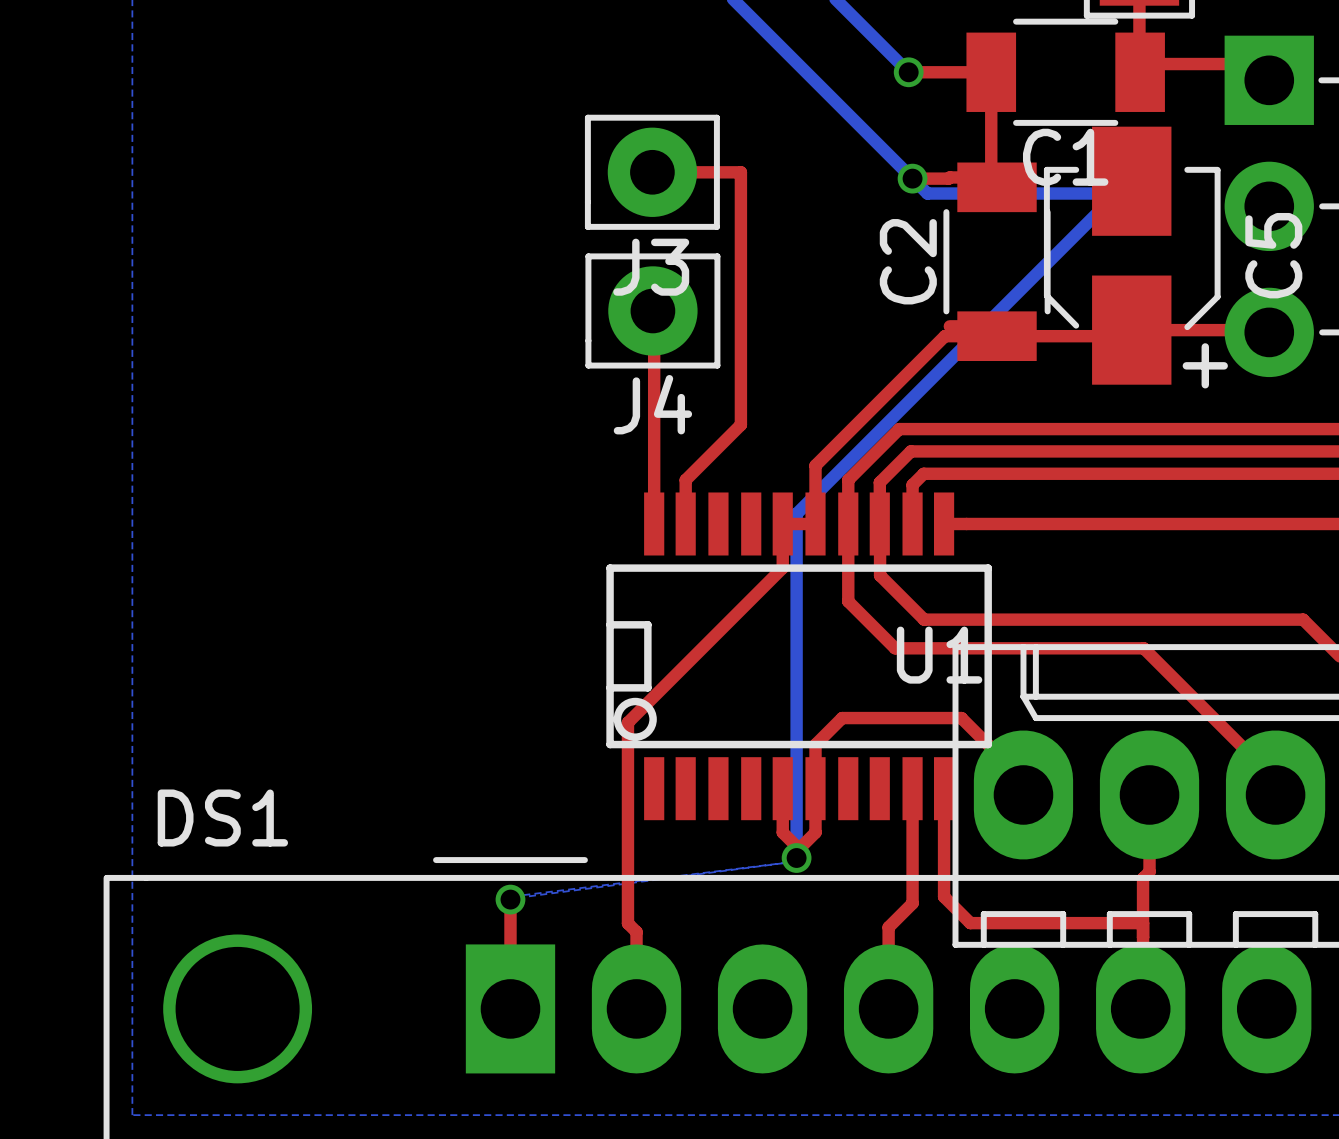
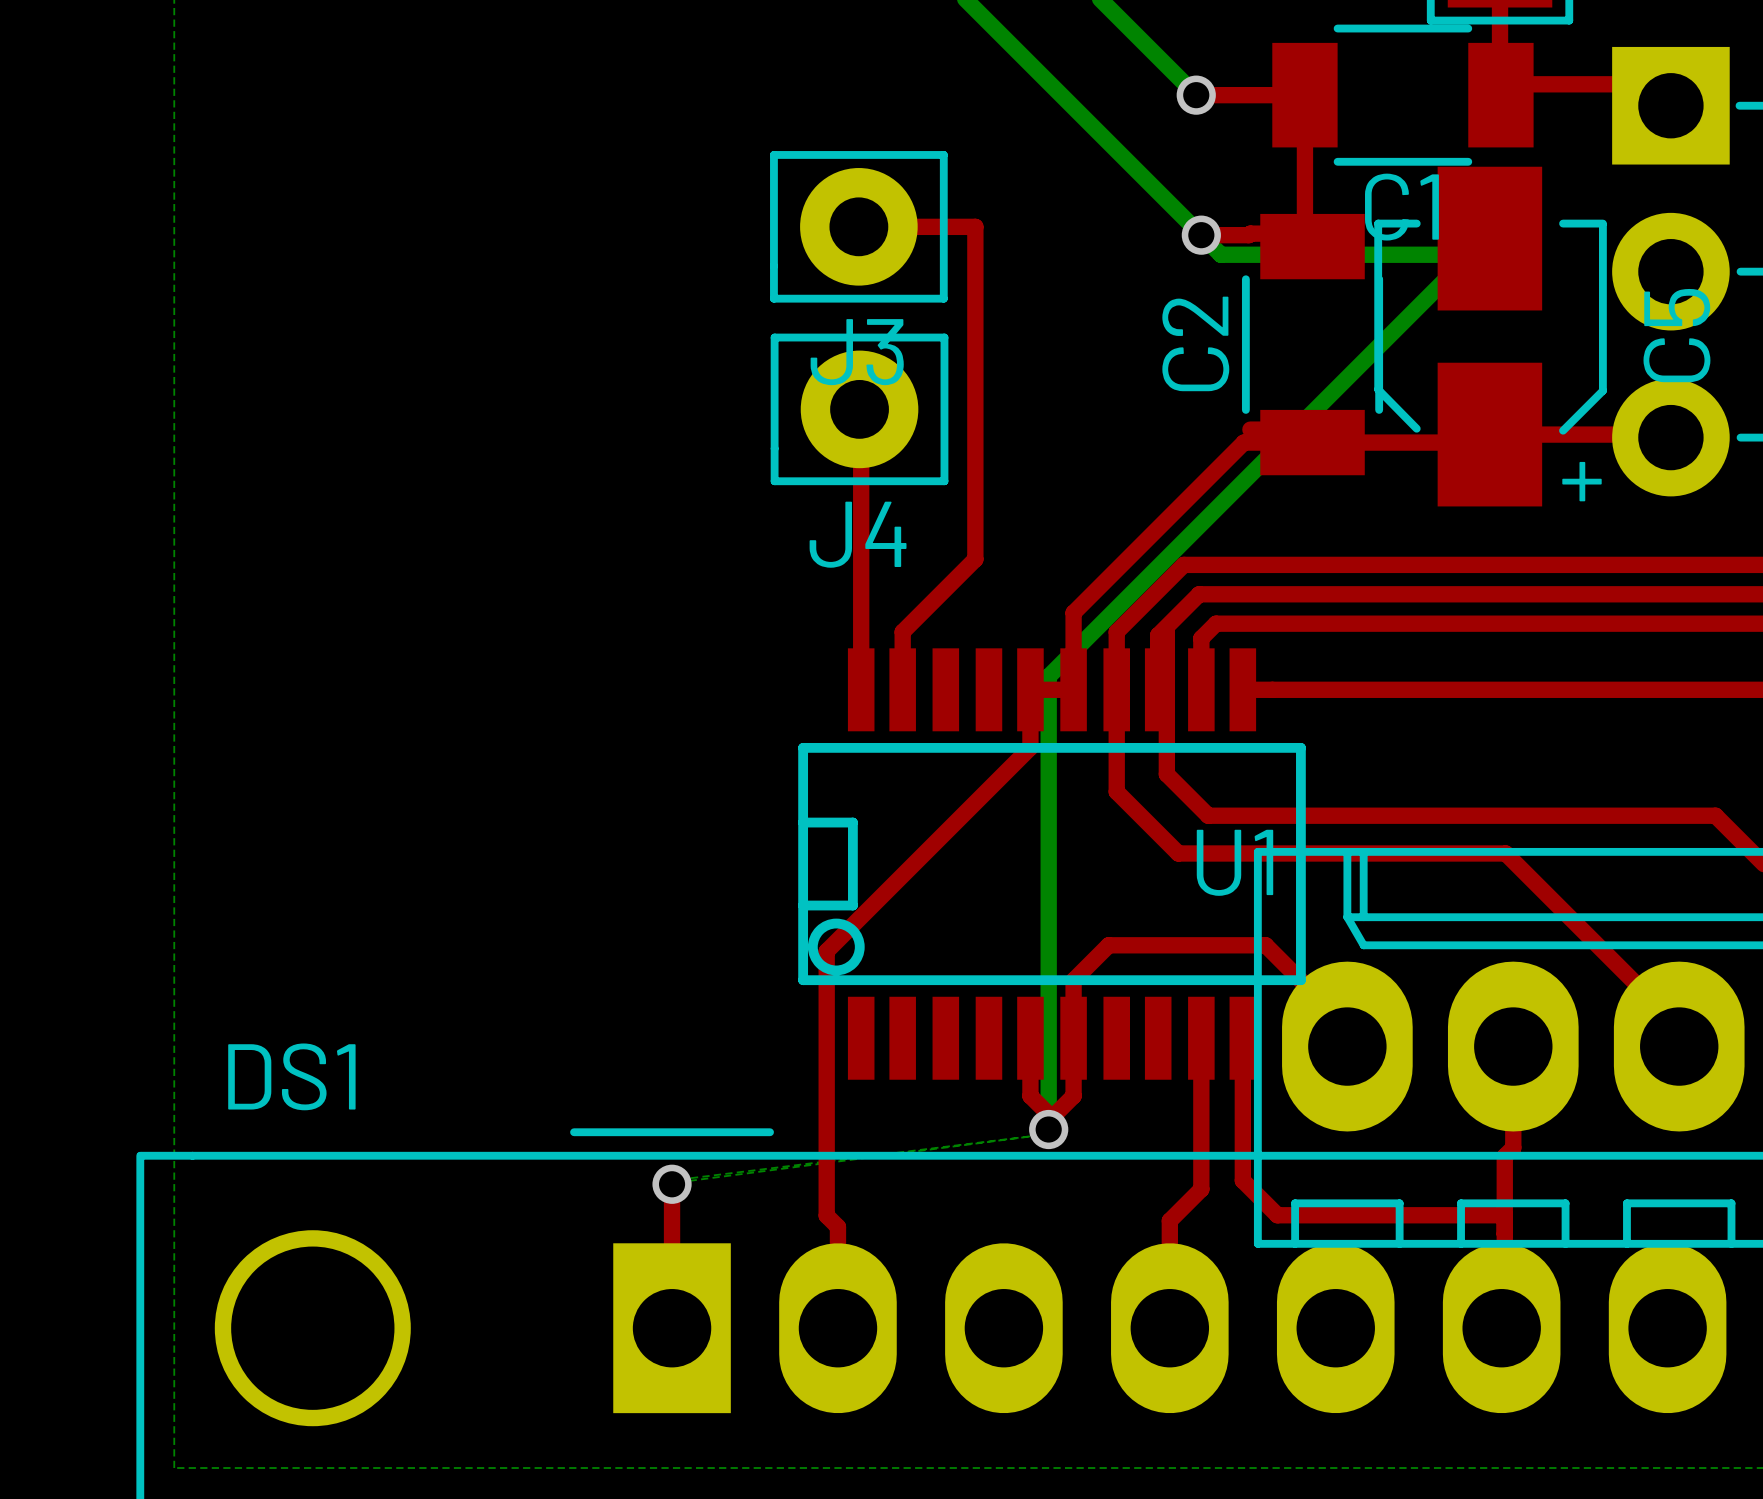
top track: (880, 504) (880, 575) (924, 619) -> (1158, 639) (1166, 631) (1166, 774) (1208, 815) (1216, 815)

